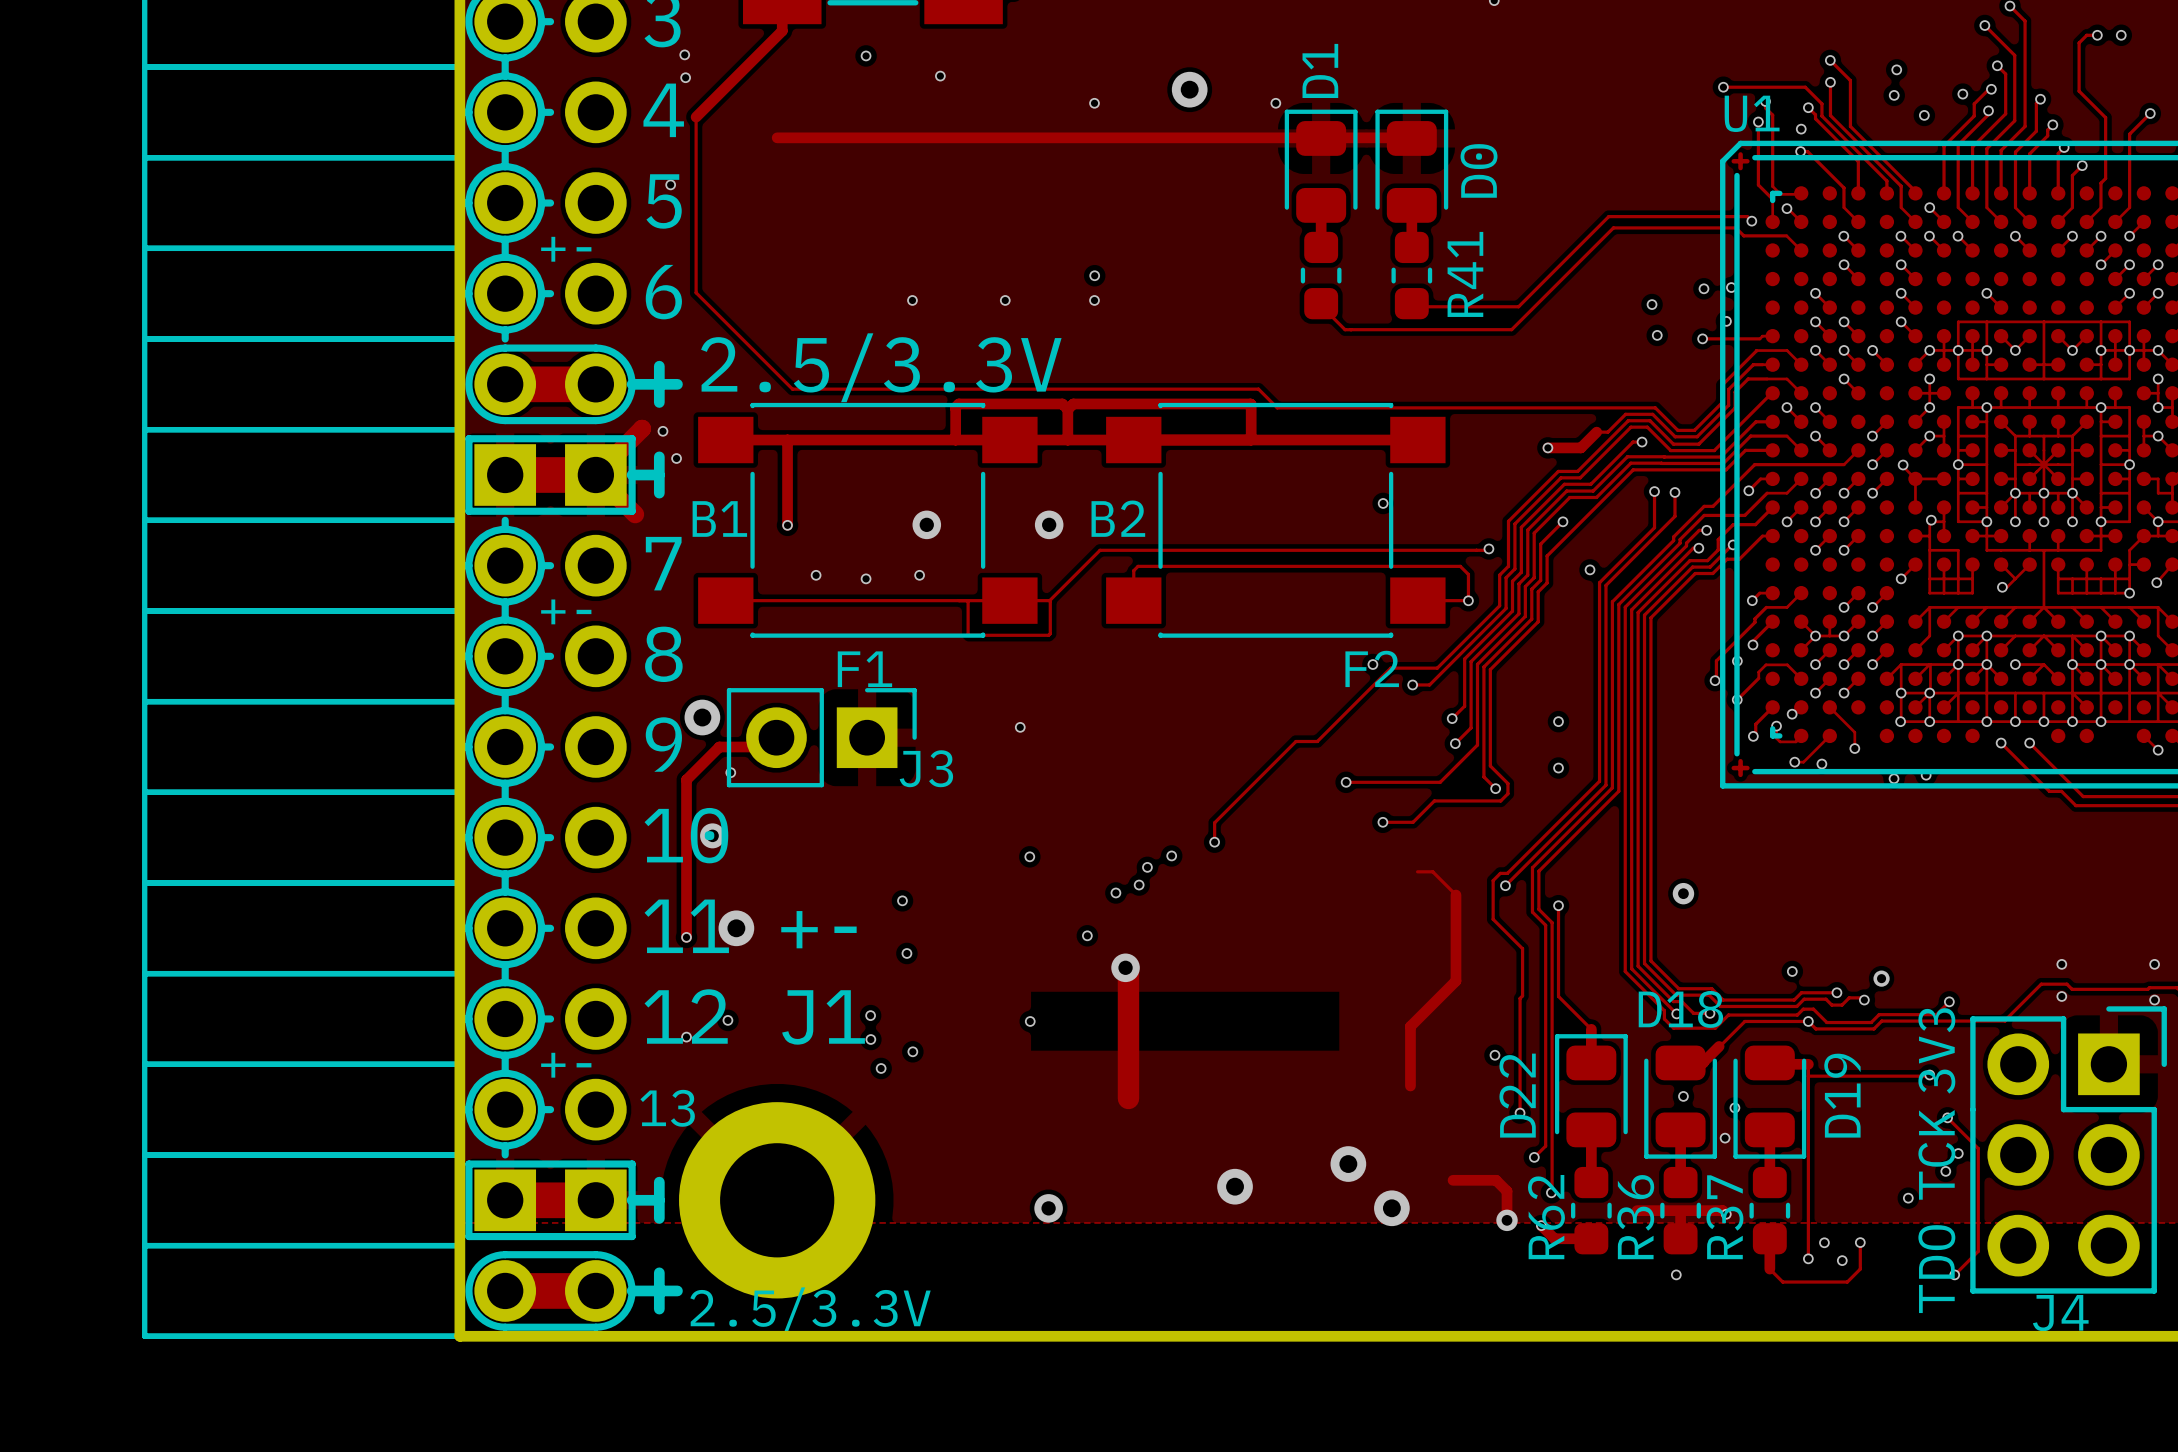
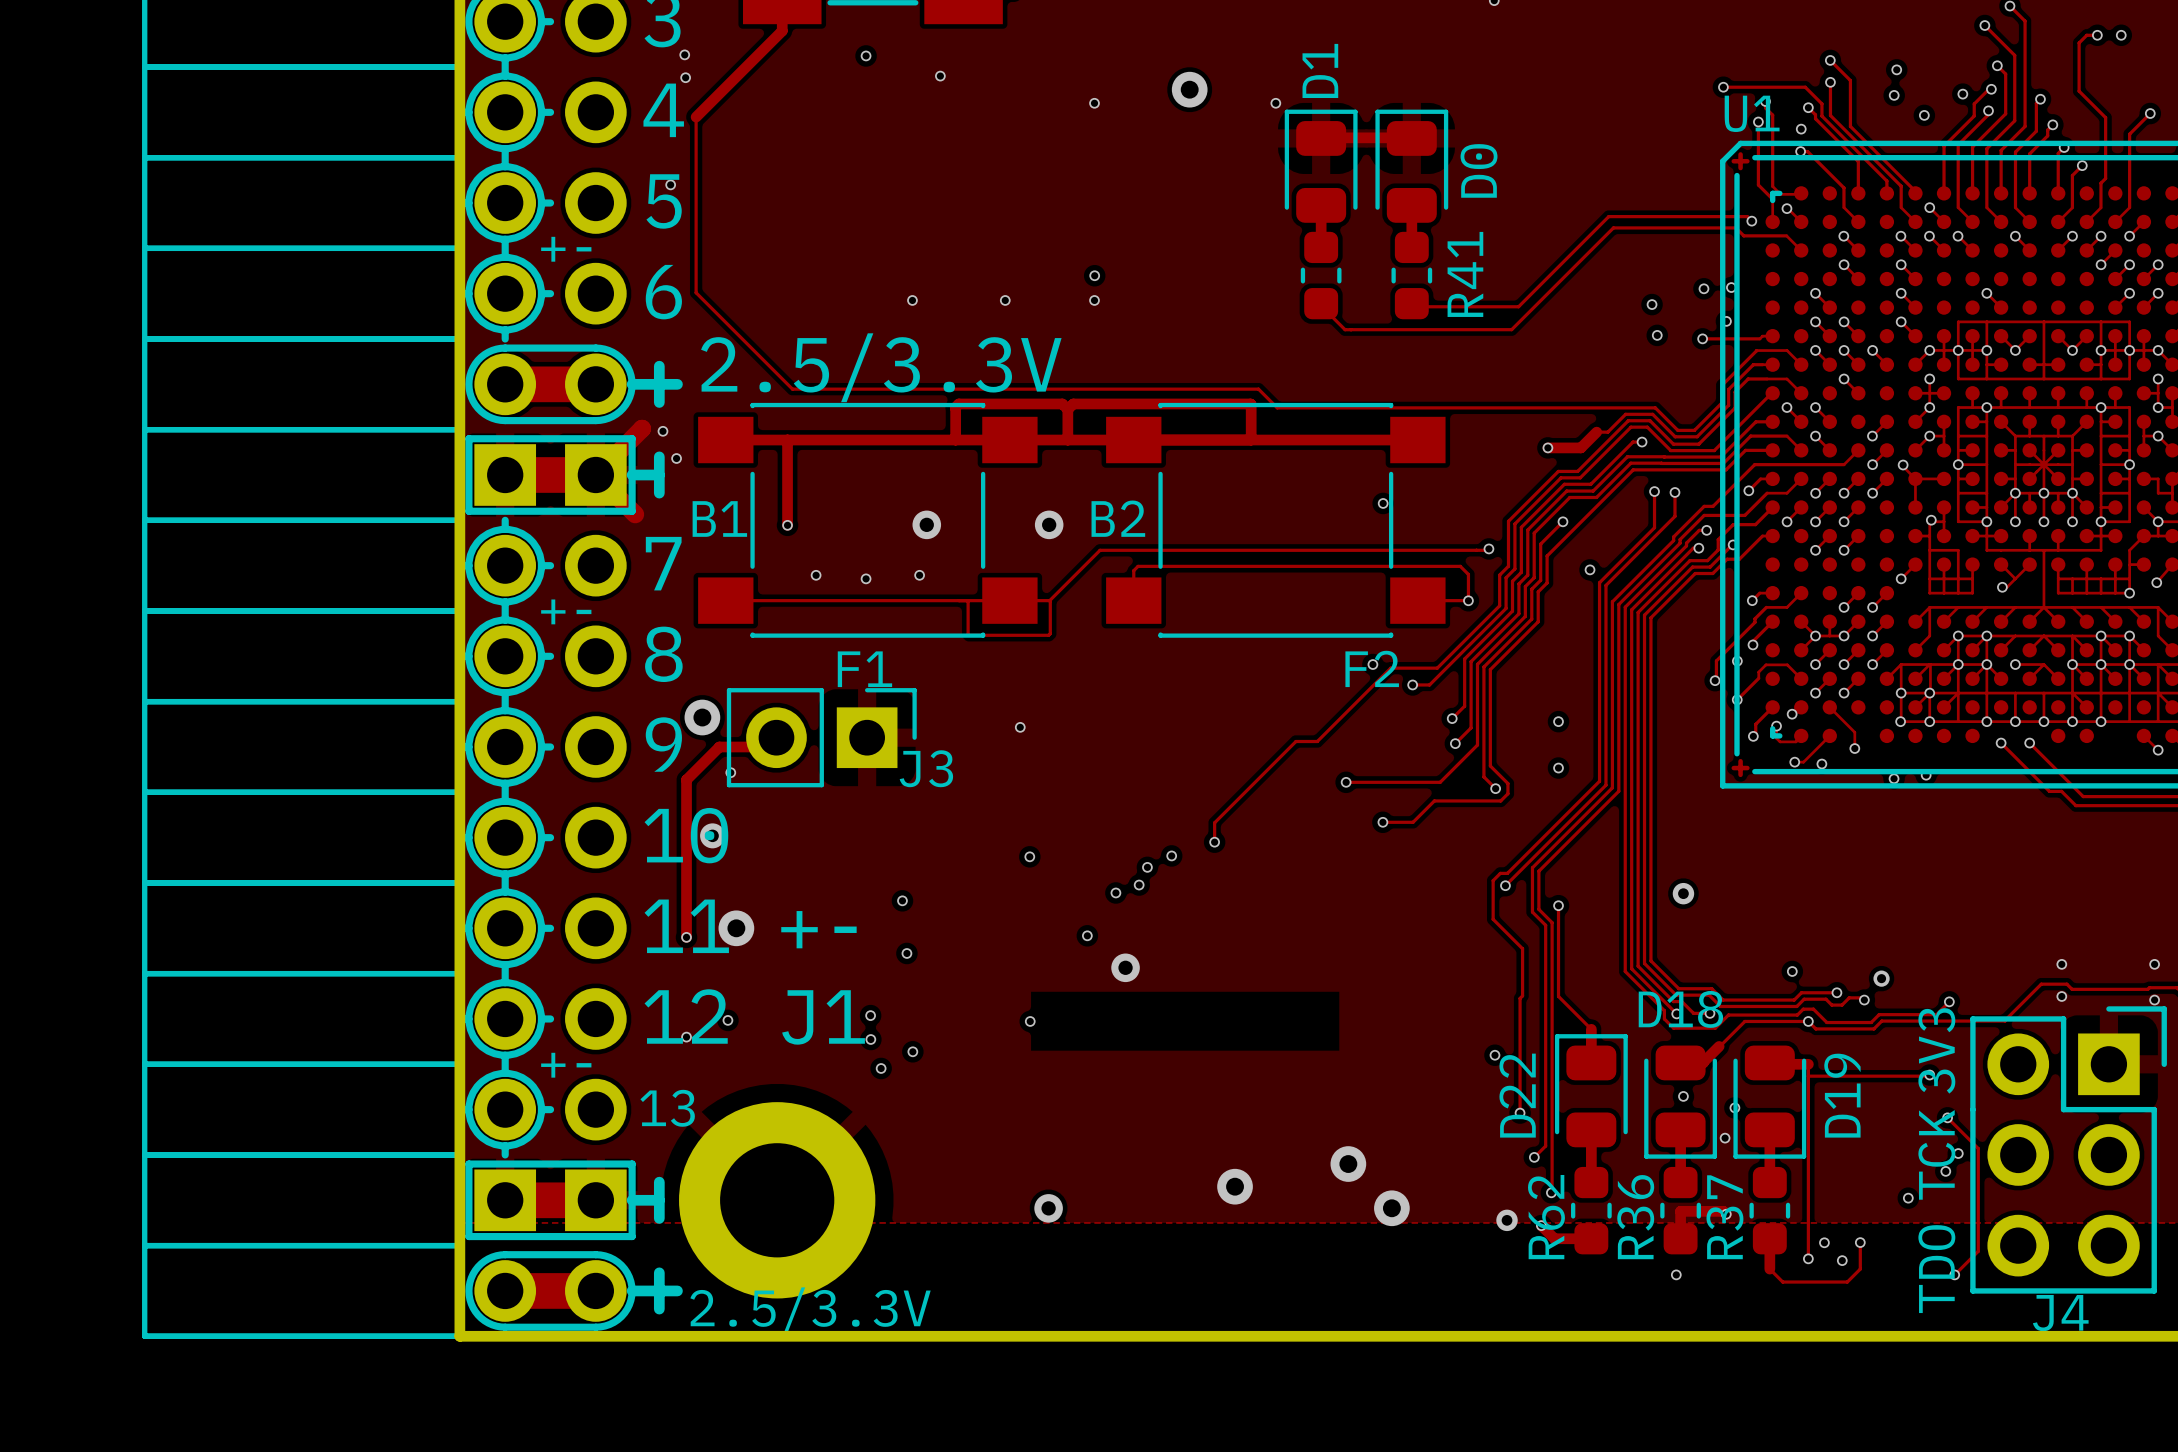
track: (777, 137) (1321, 137) -> none
track: (1417, 871) (1432, 871) (1455, 895) (1455, 981) (1410, 1026) (1410, 1085) -> none
track: (1128, 970) (1128, 1098) -> none
track: (1453, 1180) (1496, 1180) (1507, 1191) (1507, 1220) -> none
track: (1637, 1210) (1723, 1211) -> (1680, 1211) (1723, 1211)

